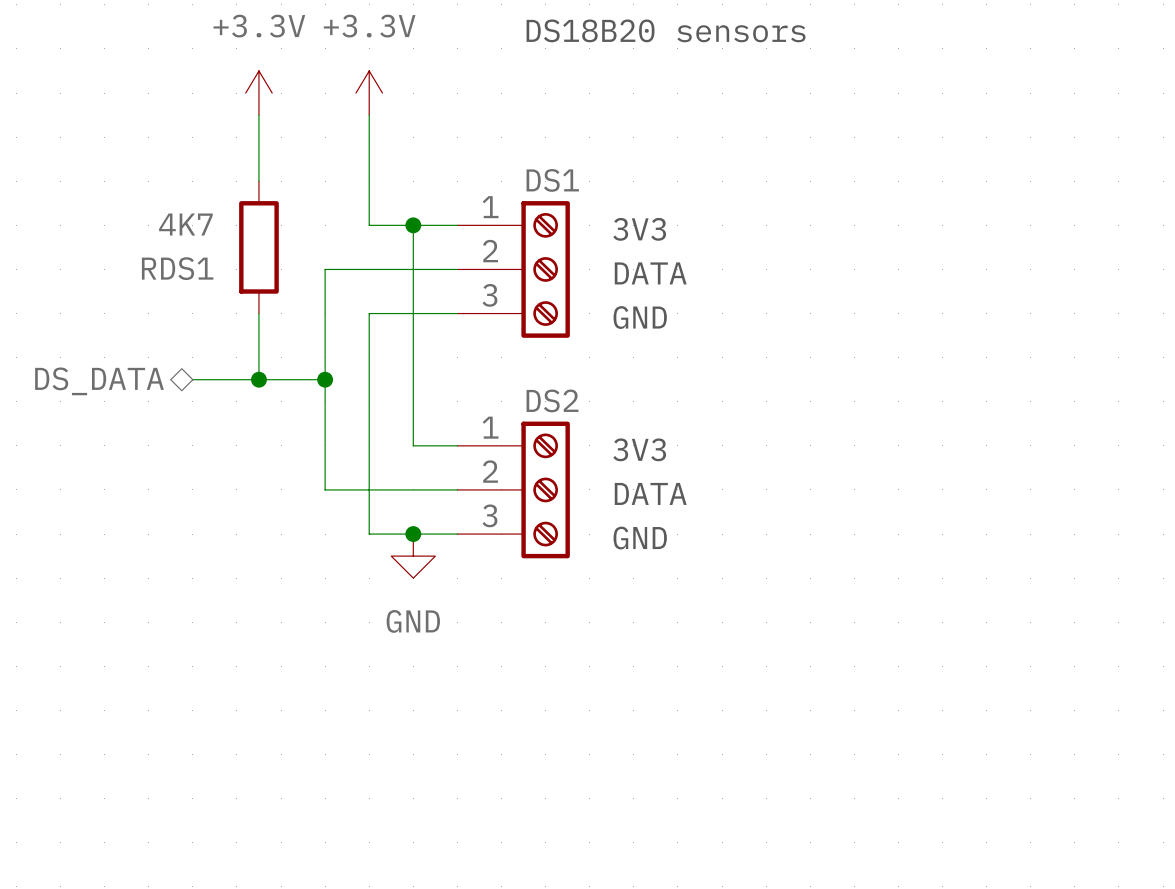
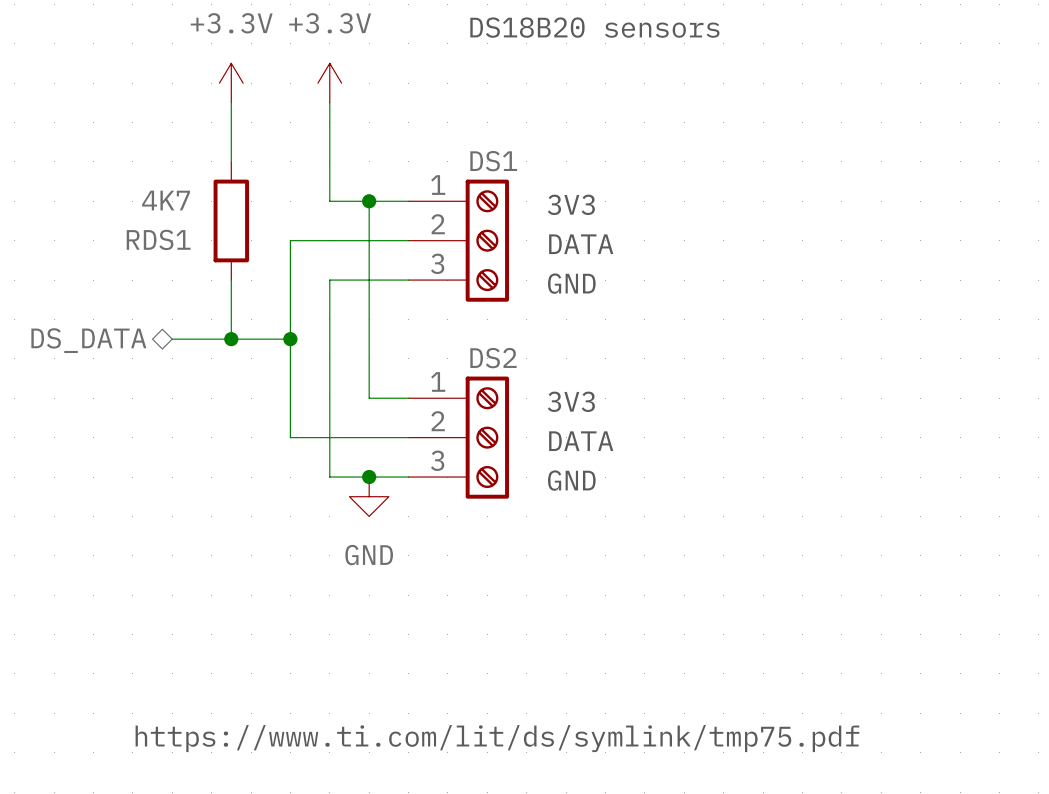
text: none -> https://www.ti.com/lit/ds/symlink/tmp75.pdf (497, 738)

